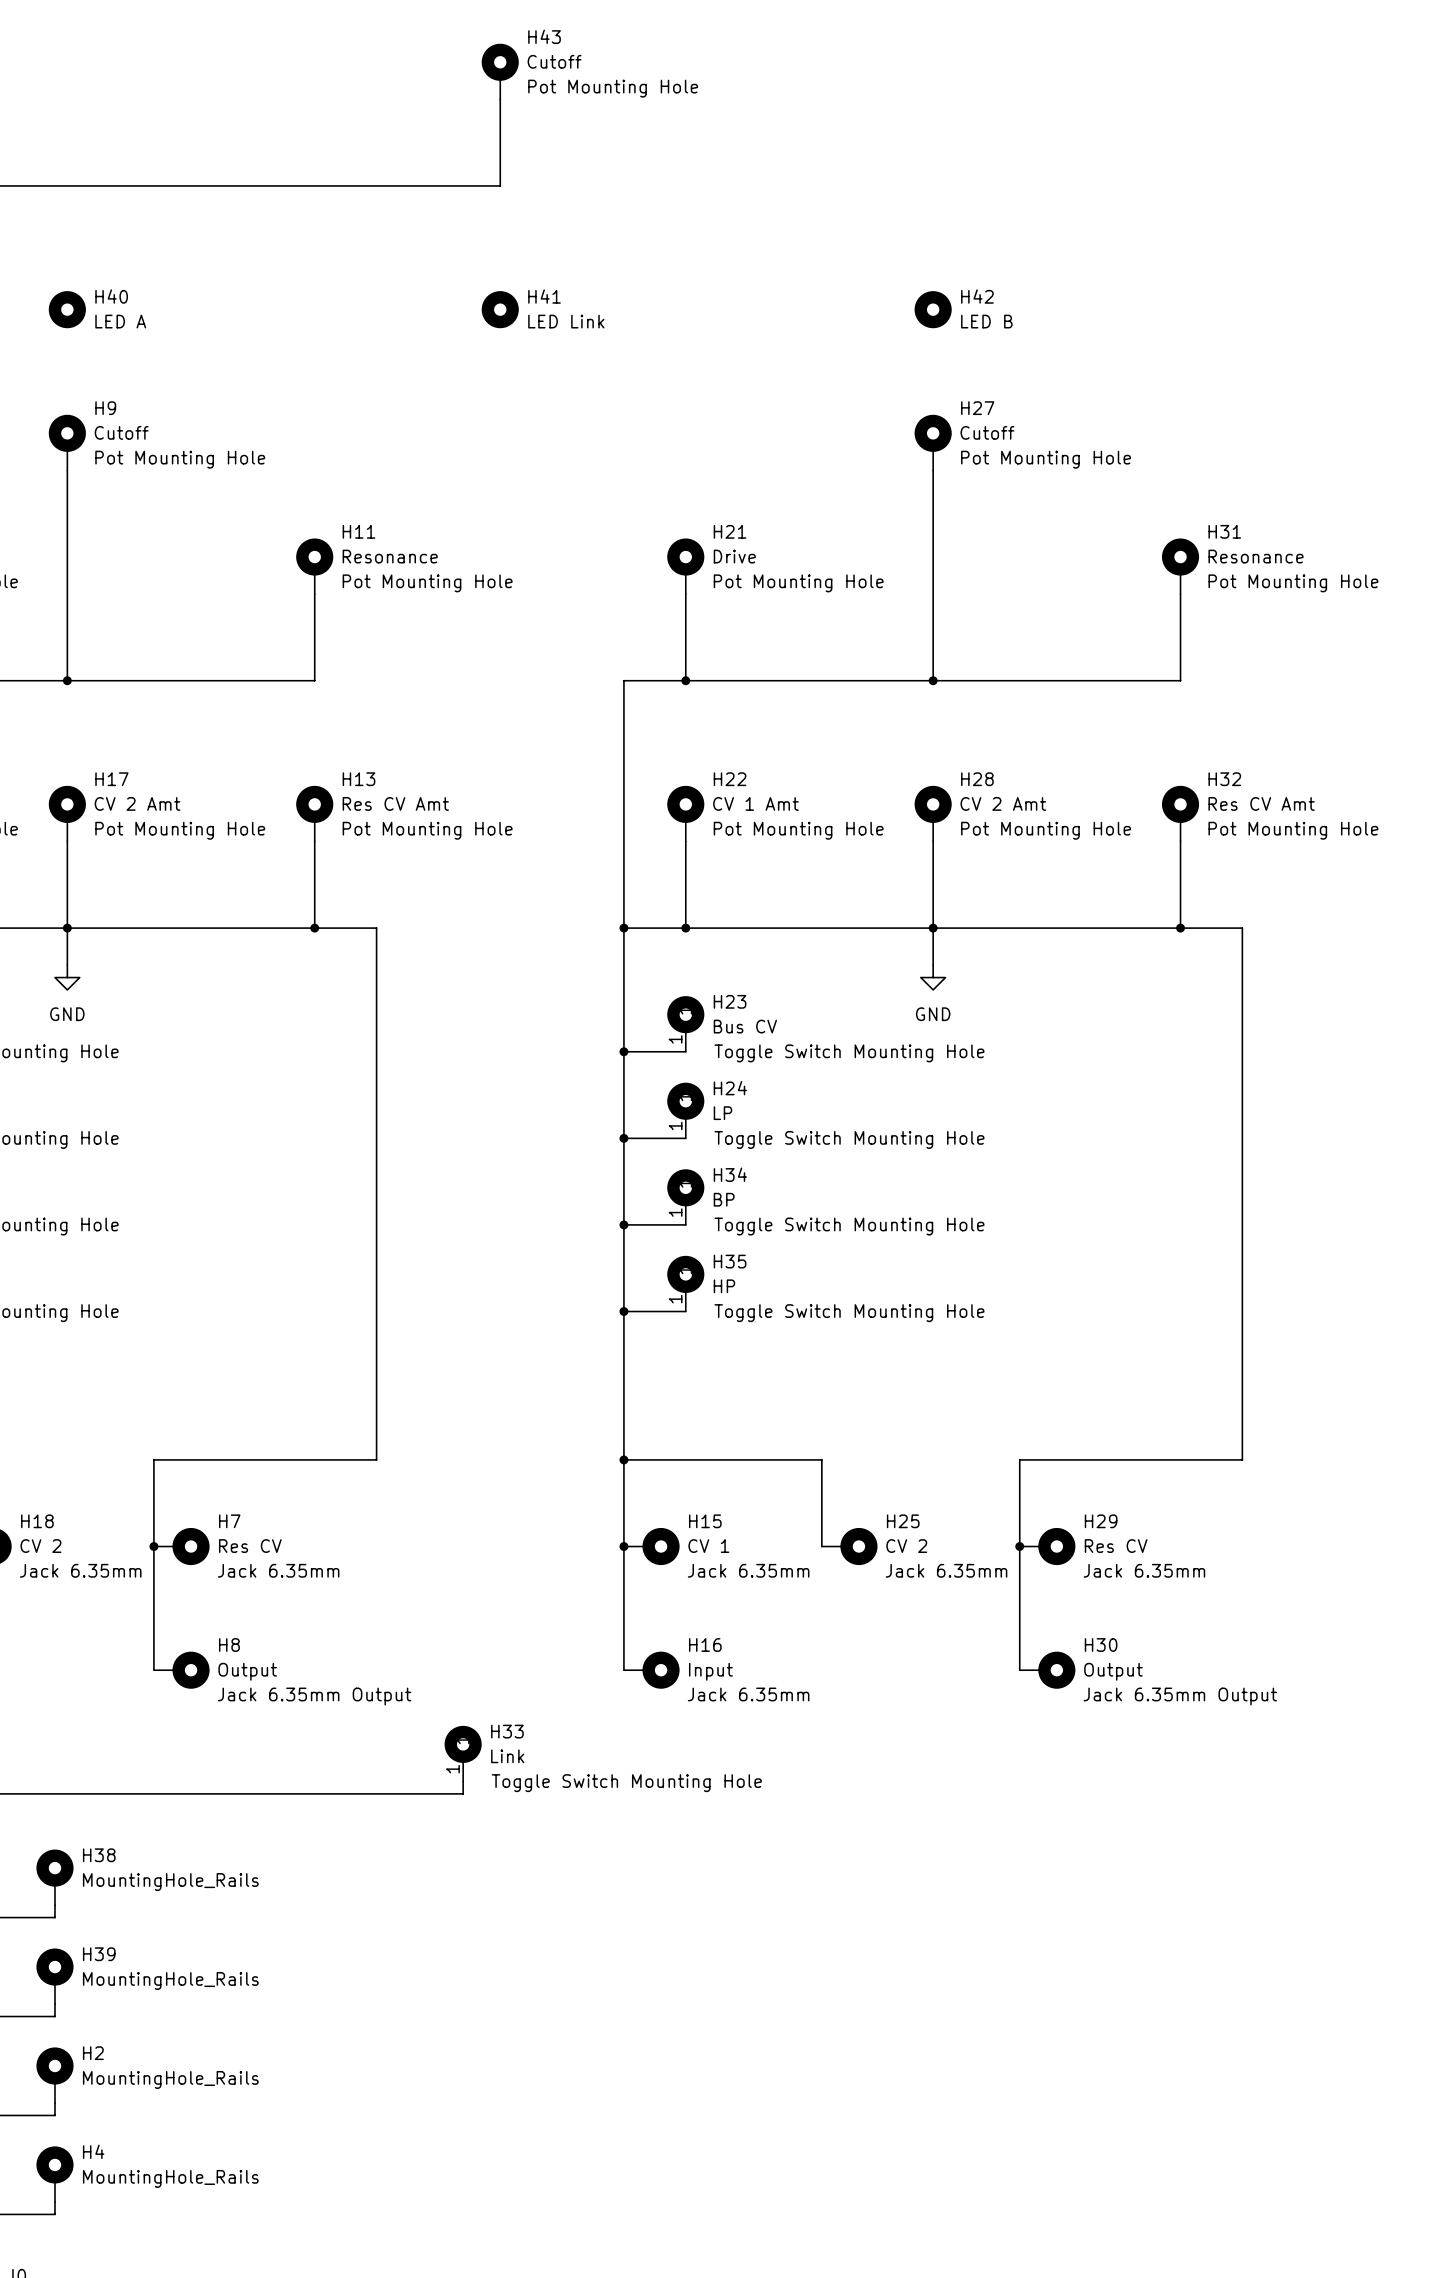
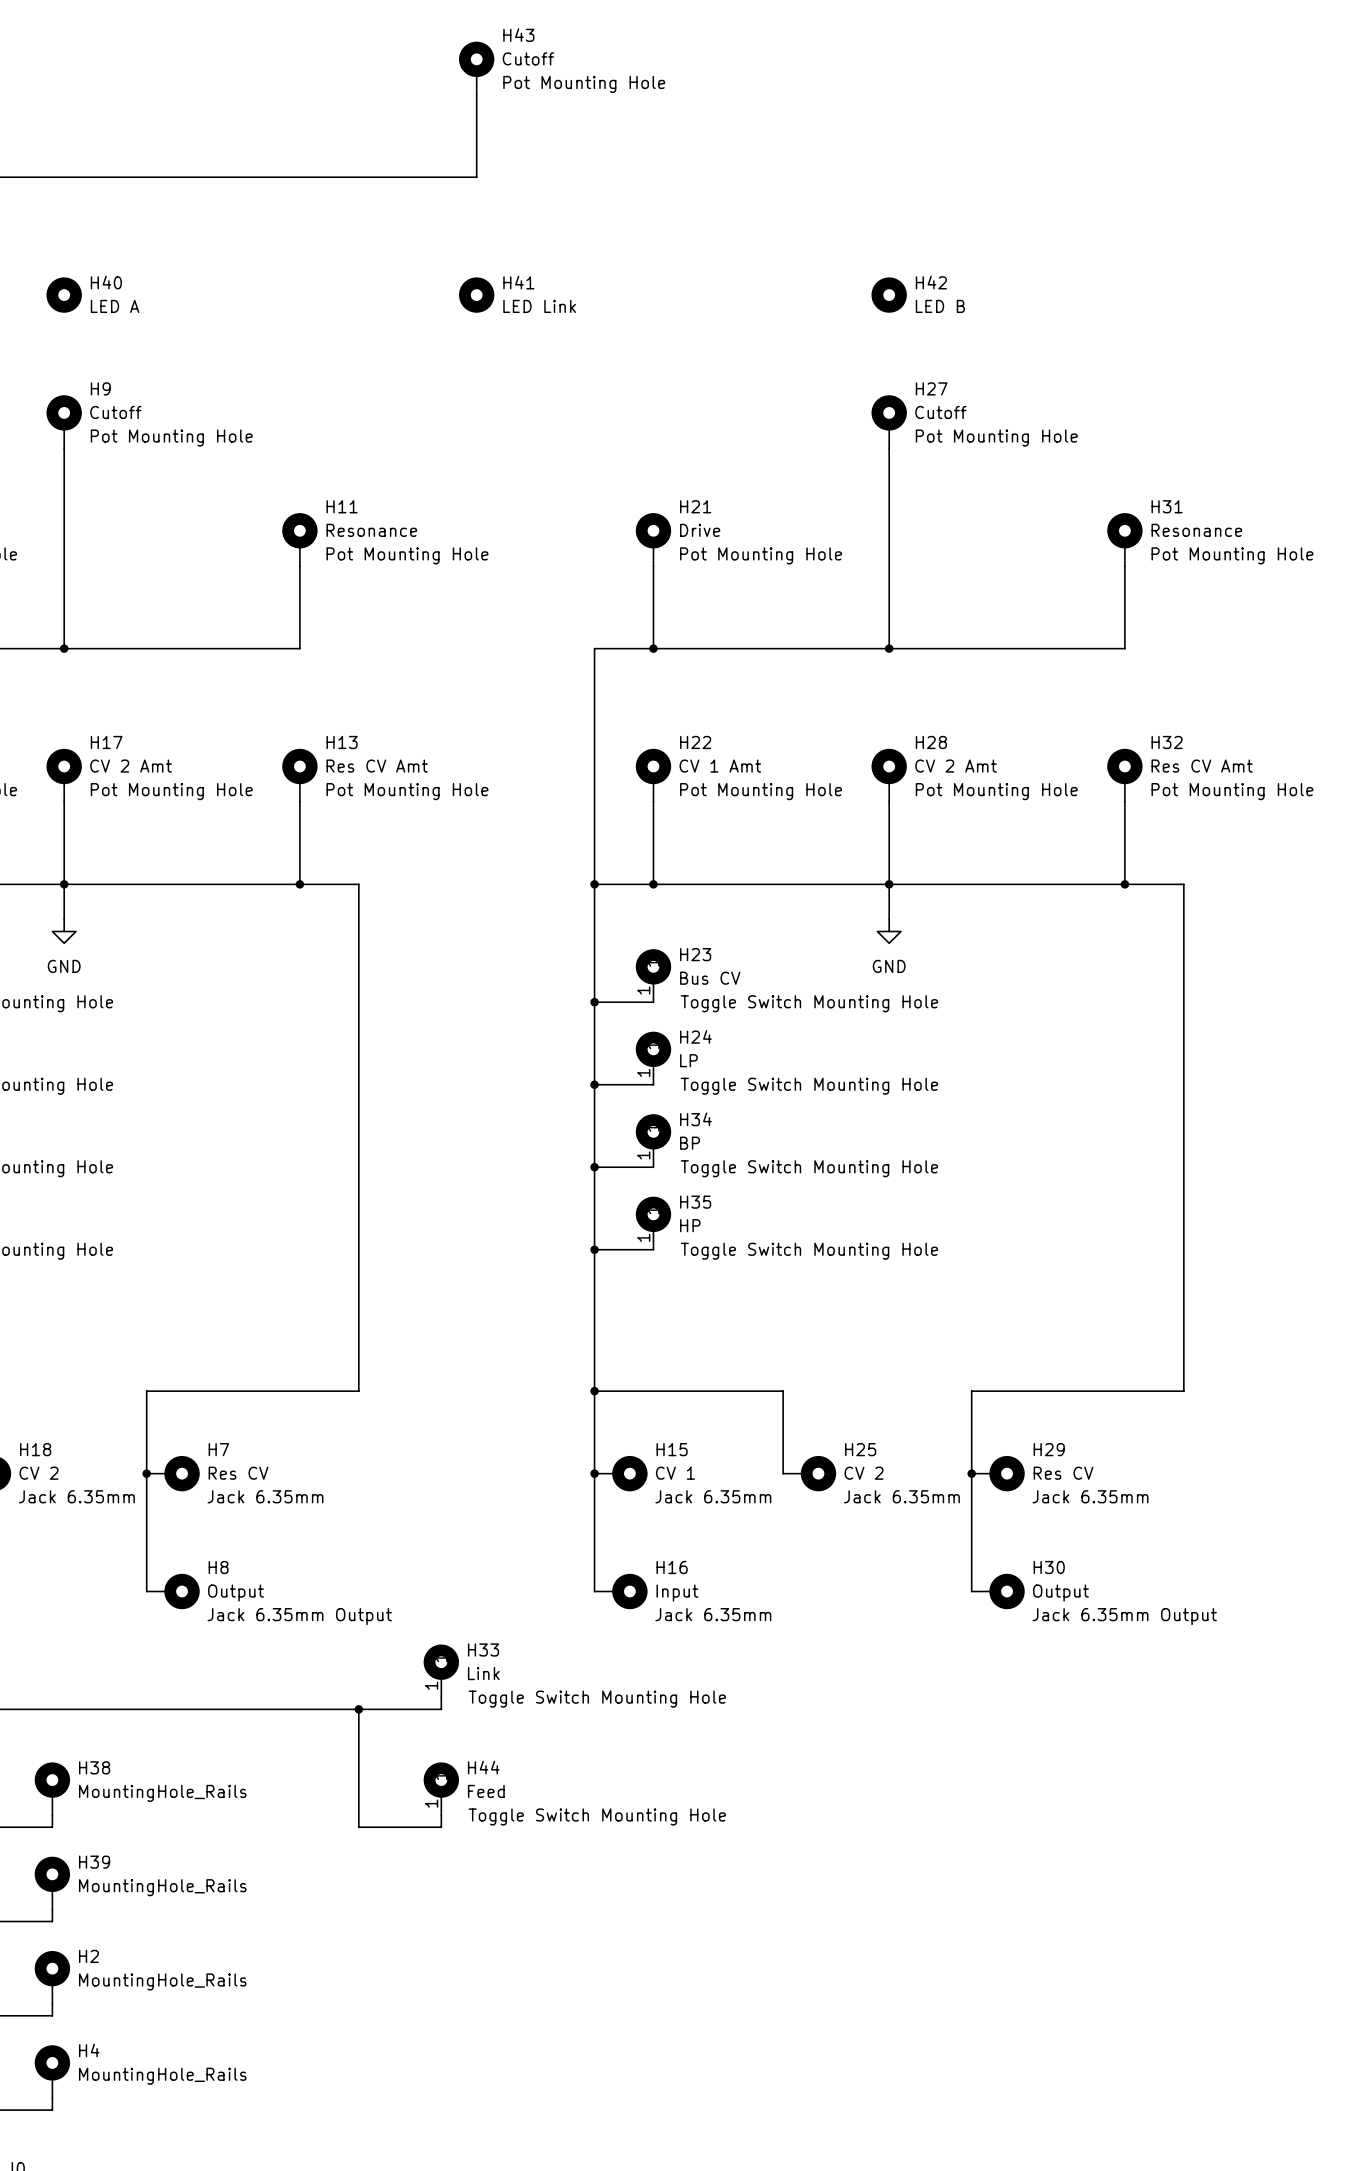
wire: none -> (358, 1709) (358, 1827) (441, 1827) (441, 1815)
junction: none -> (358, 1709)
H44: none -> Feed (441, 1788)

